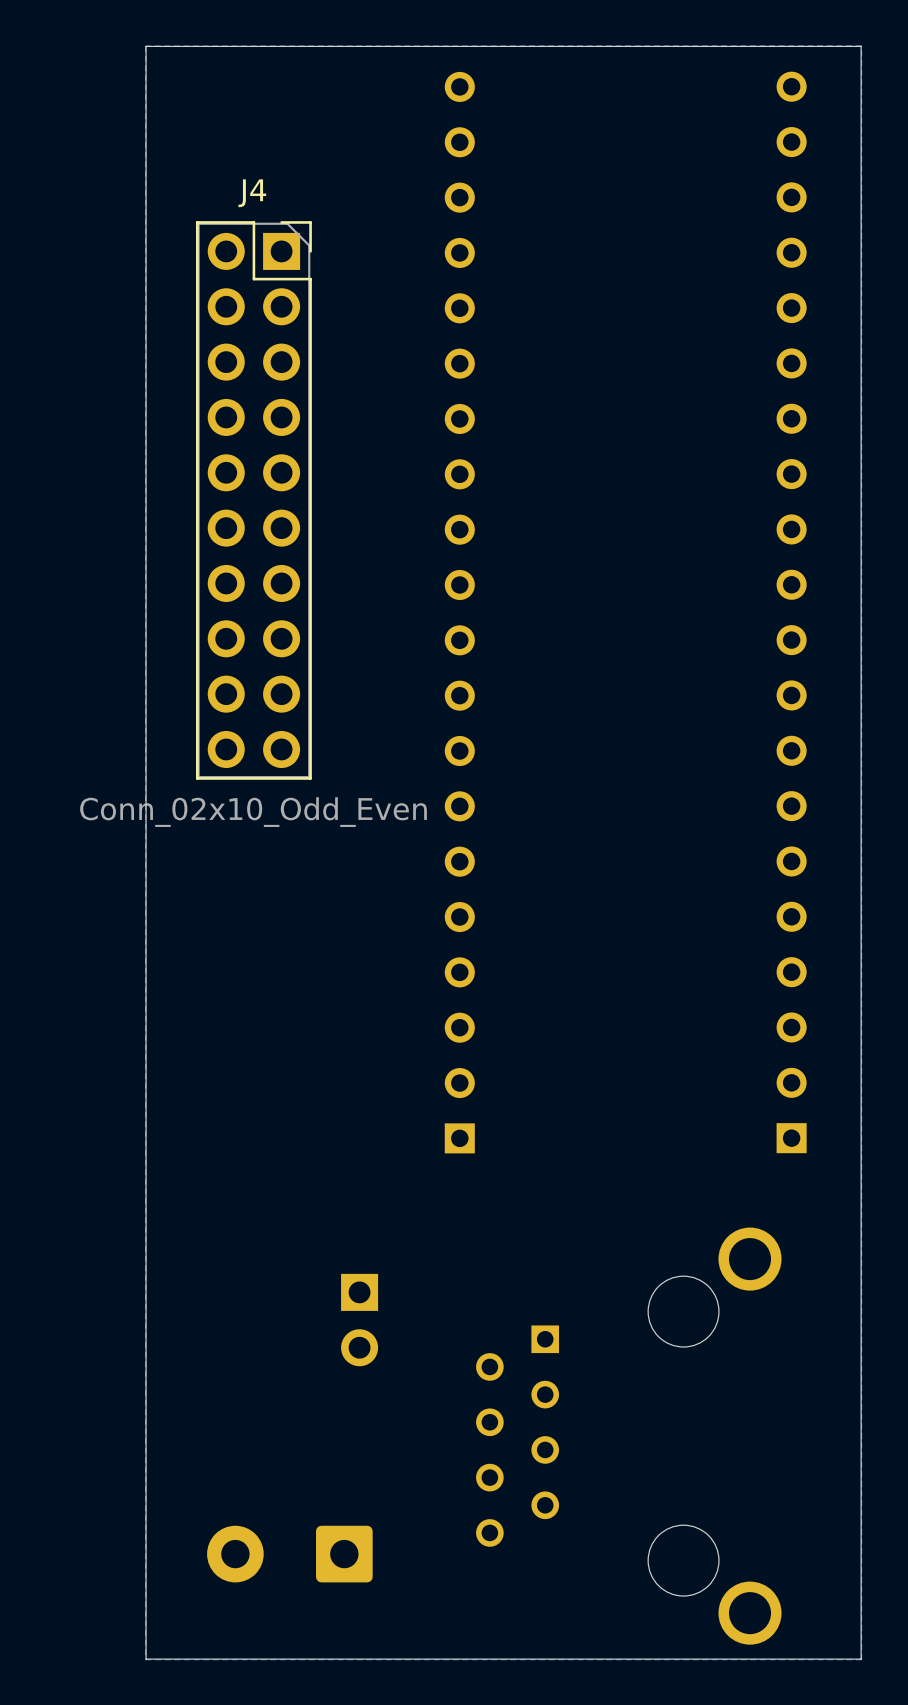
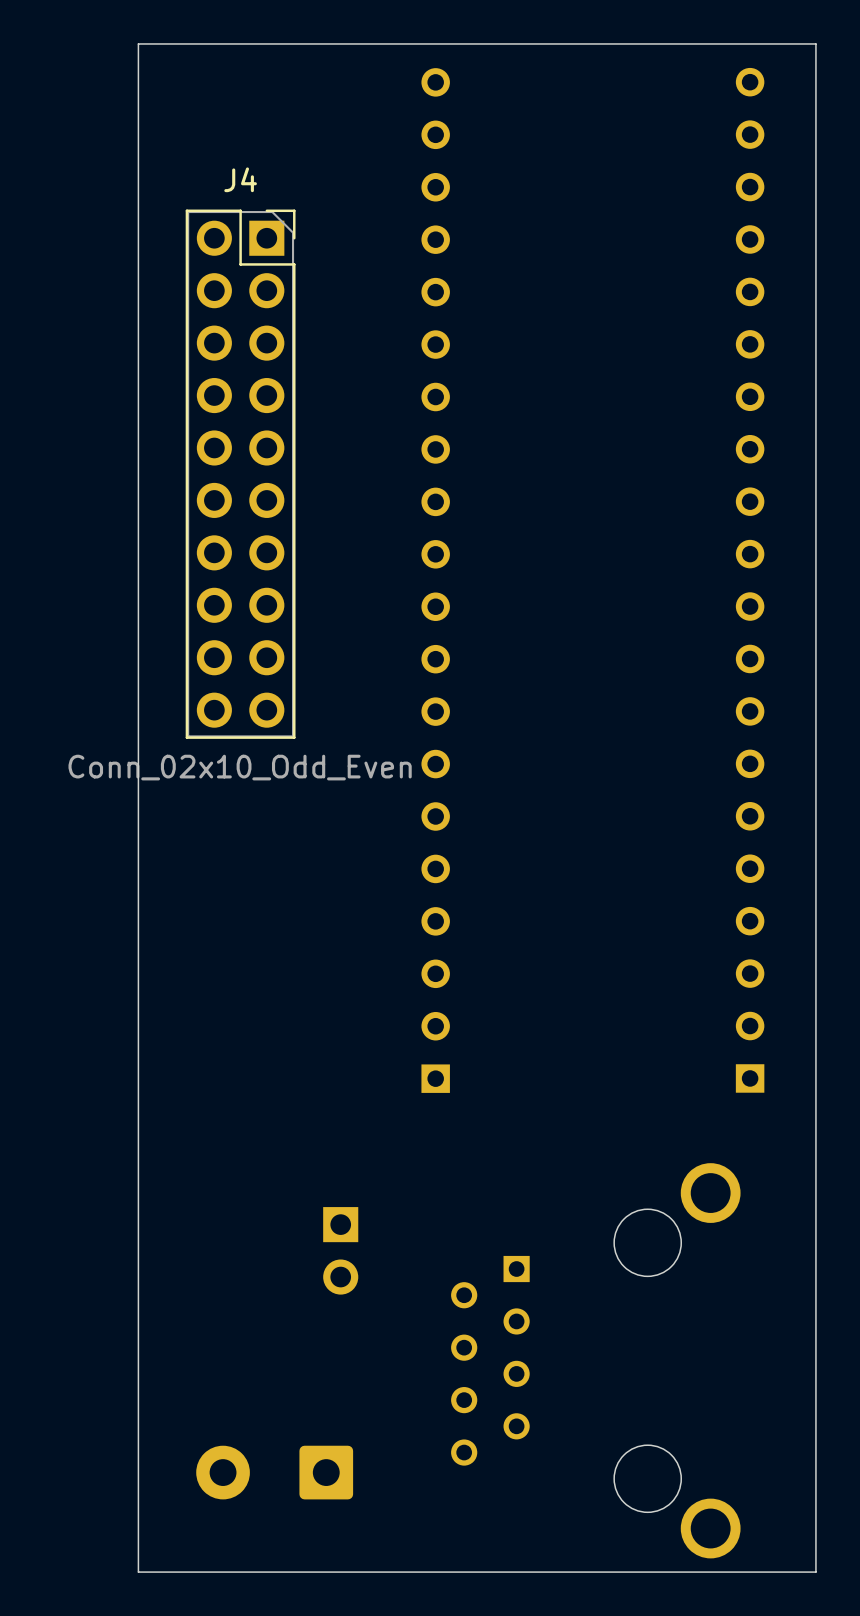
zone outline: (861, 45) (145, 46) (145, 1659) (861, 1659) (861, 45) -> none

